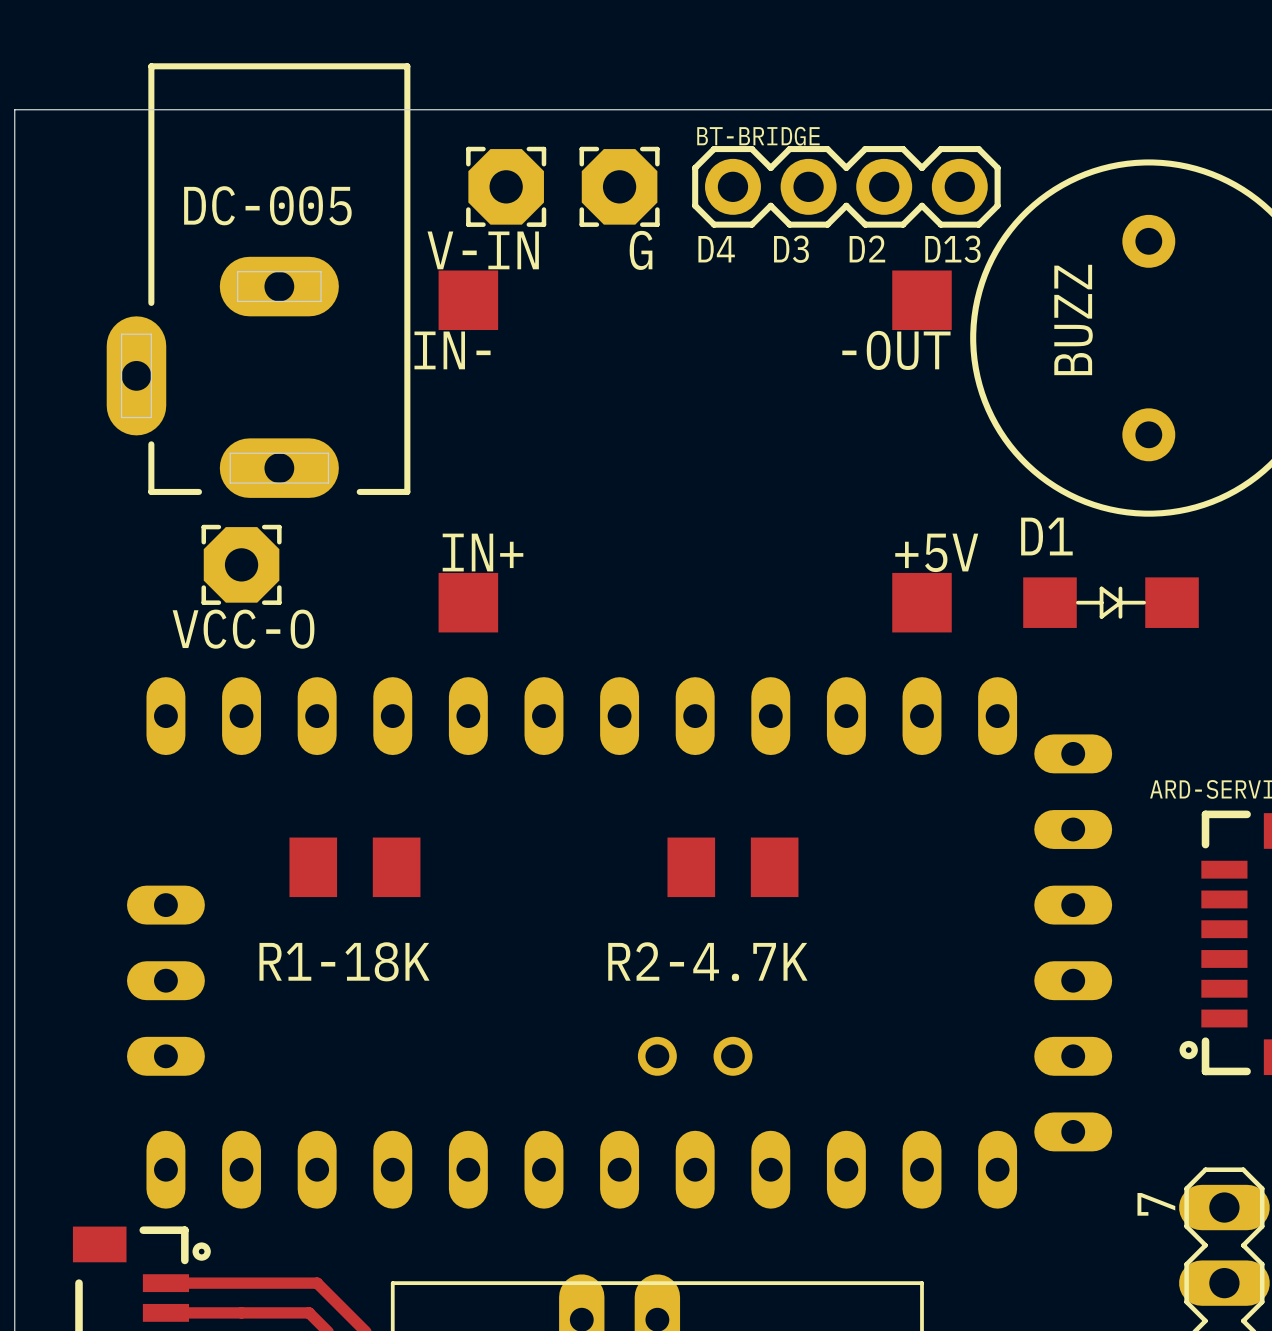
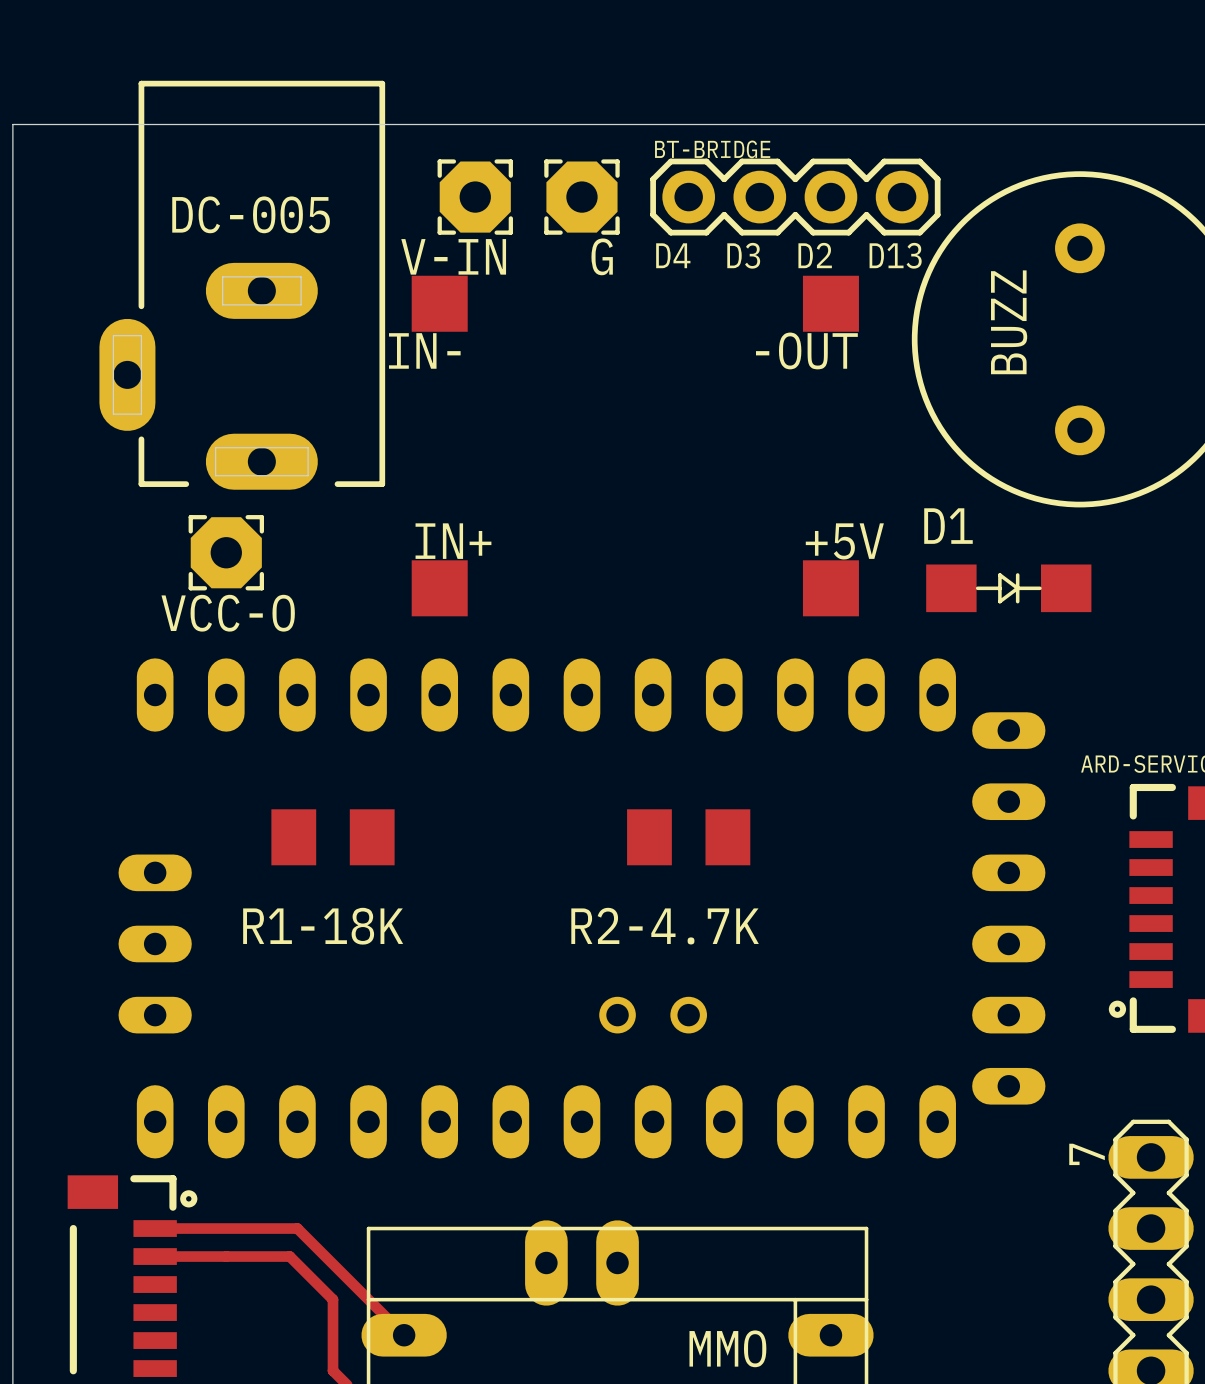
-OUT position: (921, 300) -> (830, 303)
+5V position: (921, 602) -> (830, 588)
D1 position: (1111, 602) -> (1008, 588)

